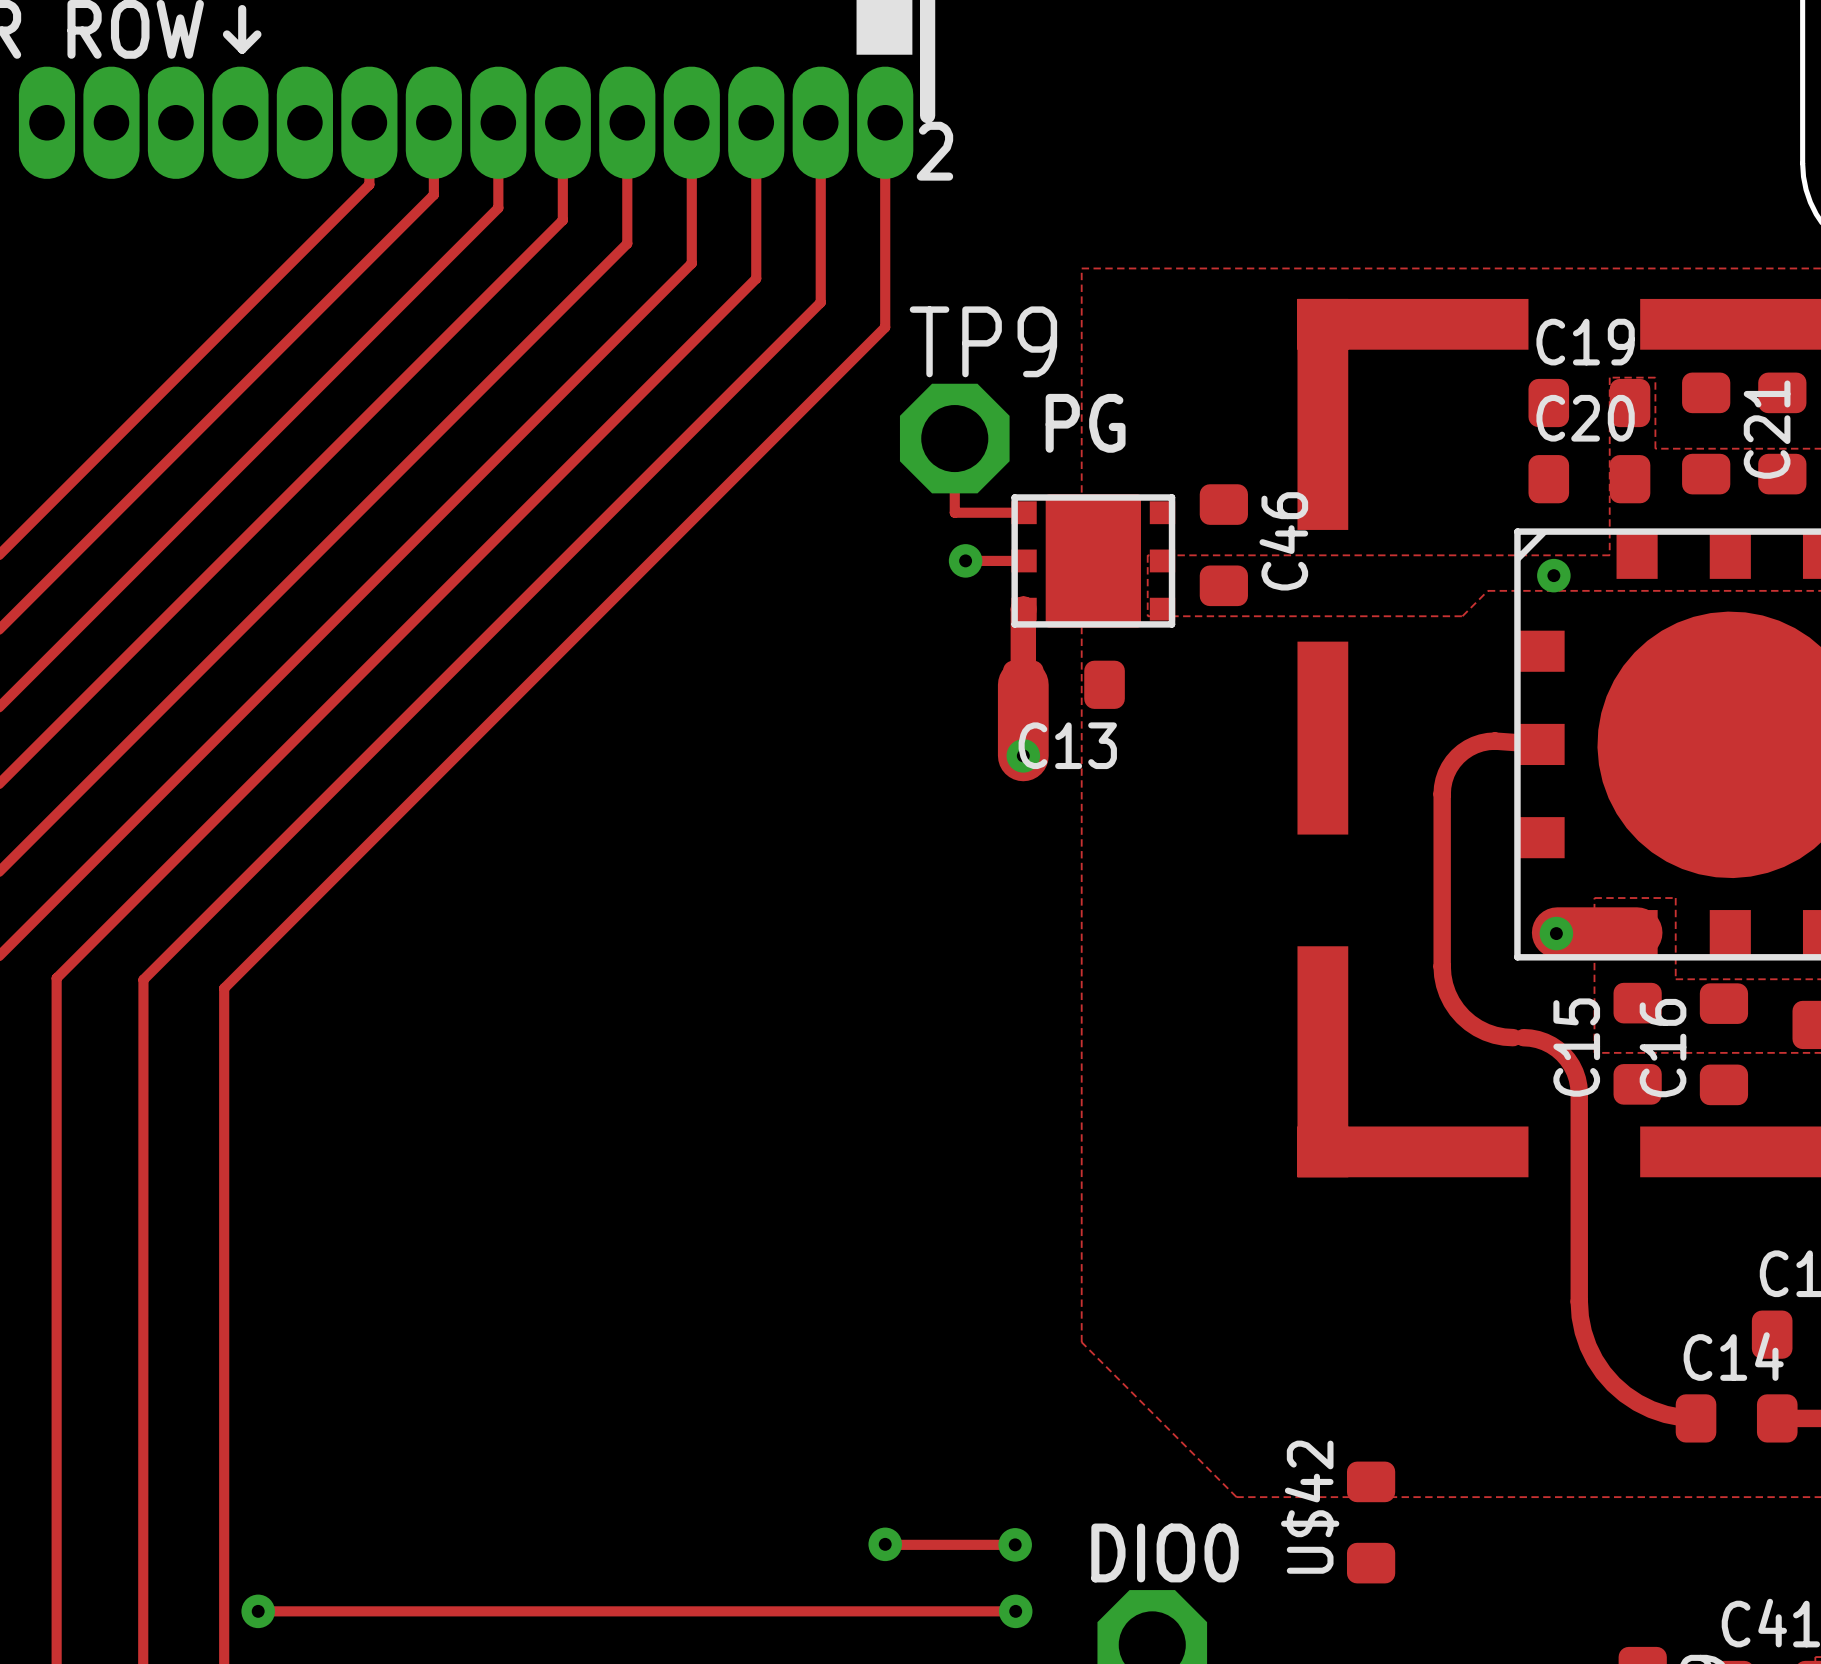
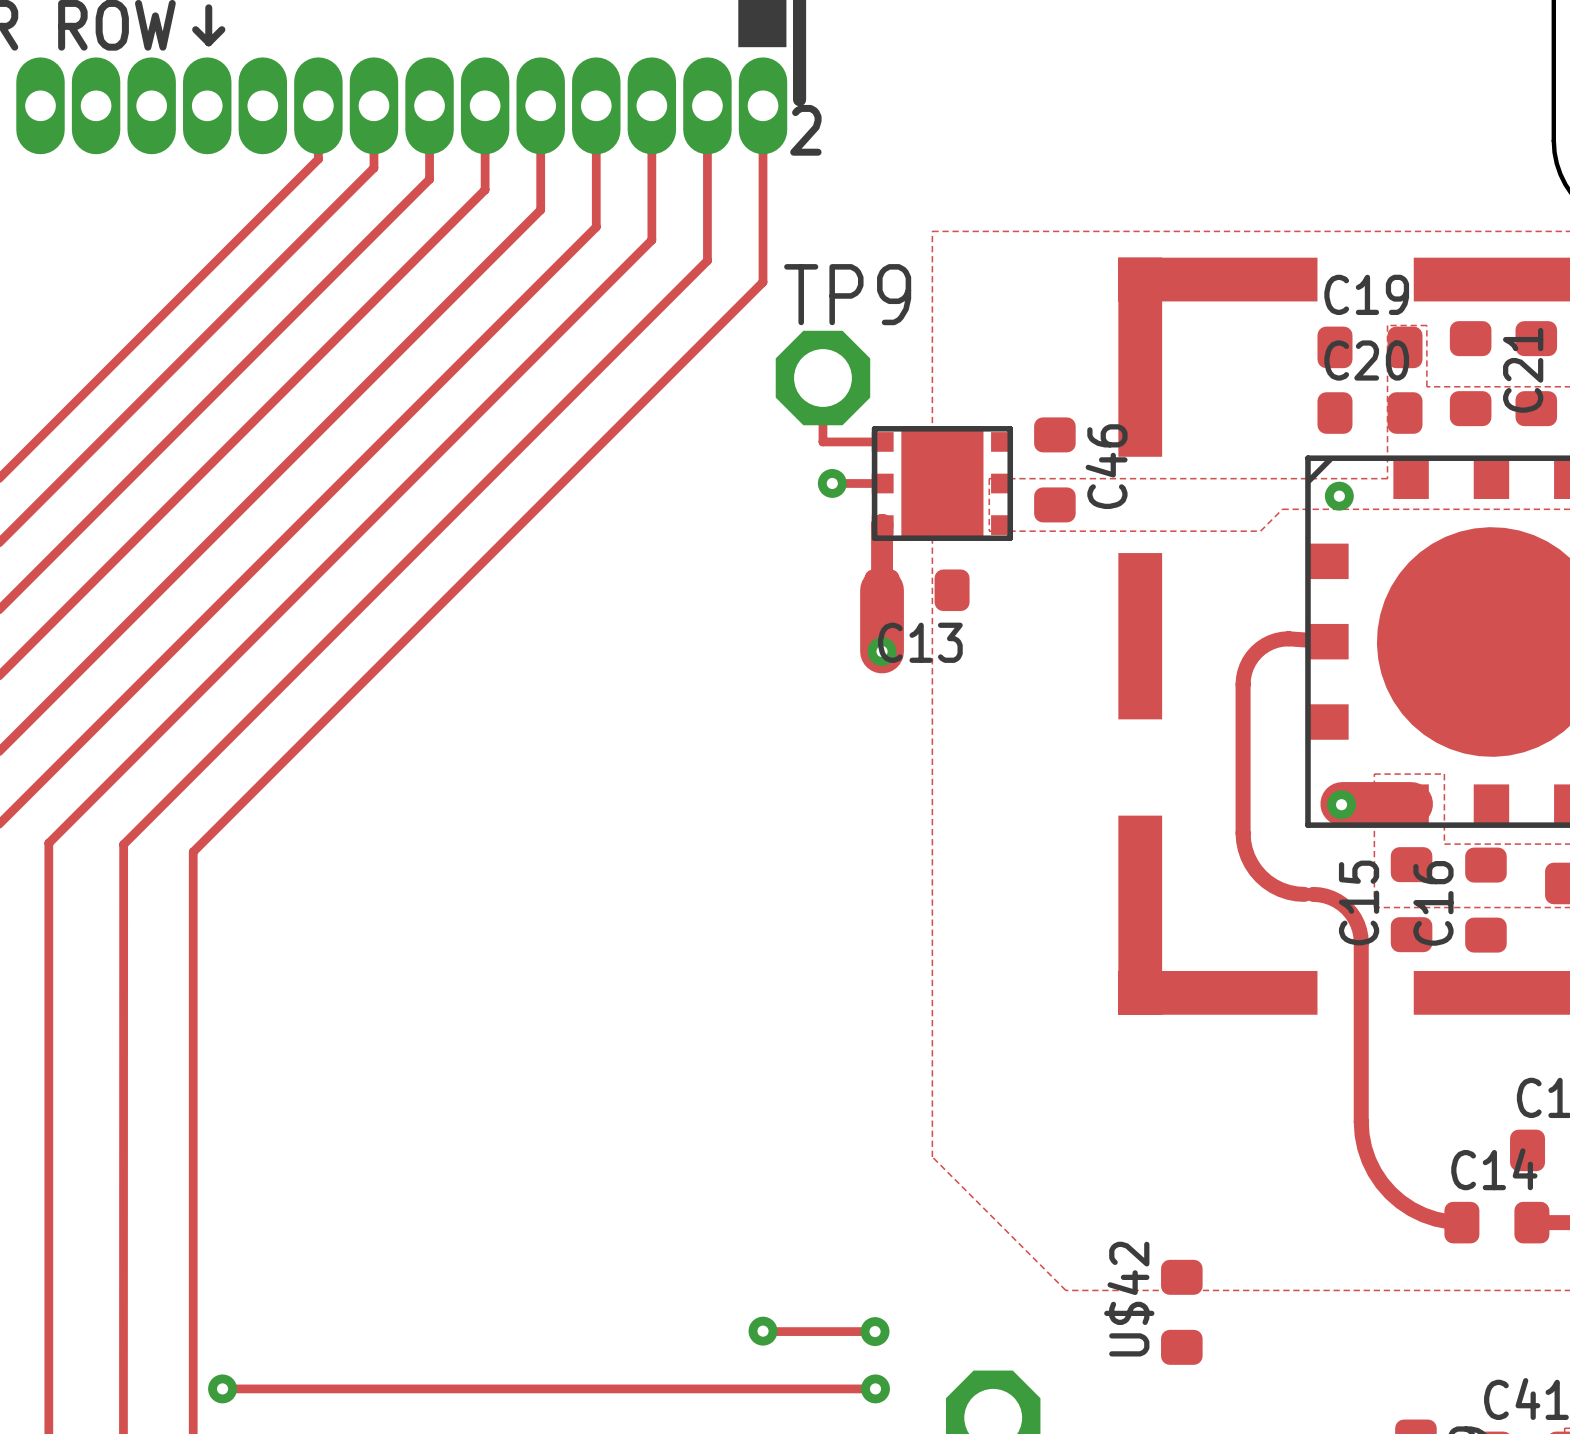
text: PG (1085, 423) -> none
text: DIO0 (1165, 1552) -> none

